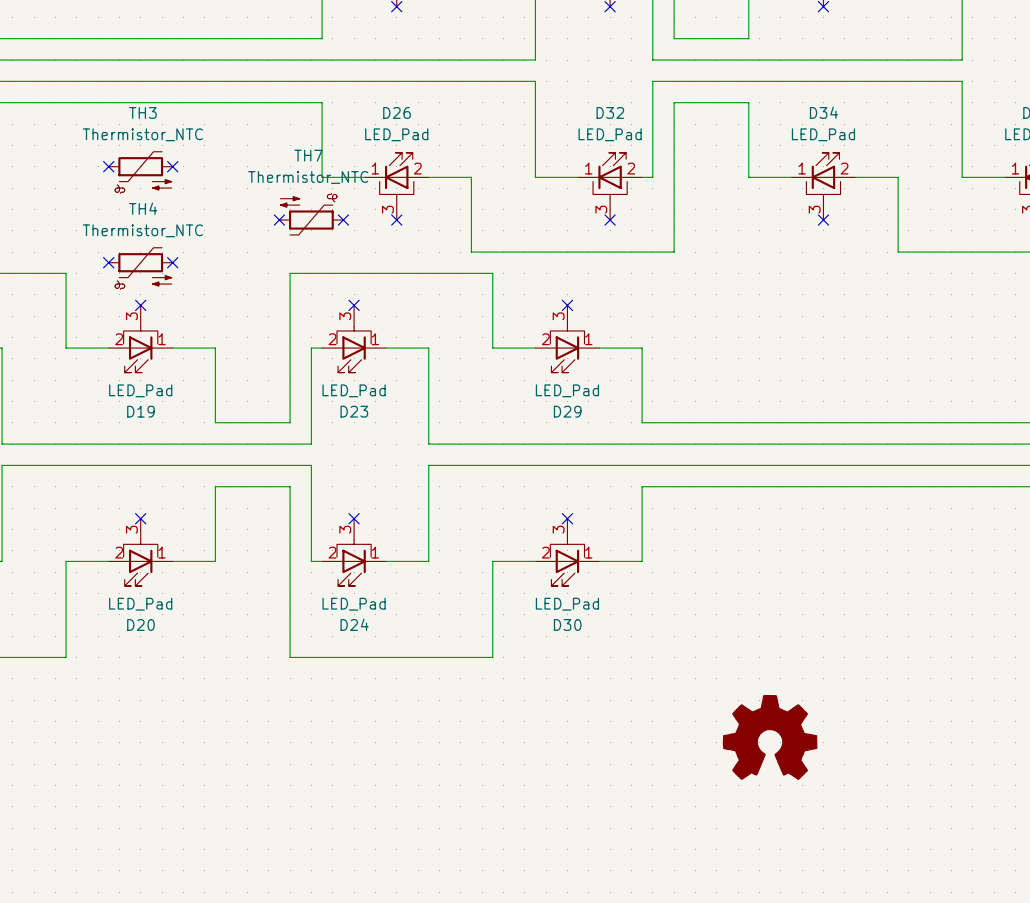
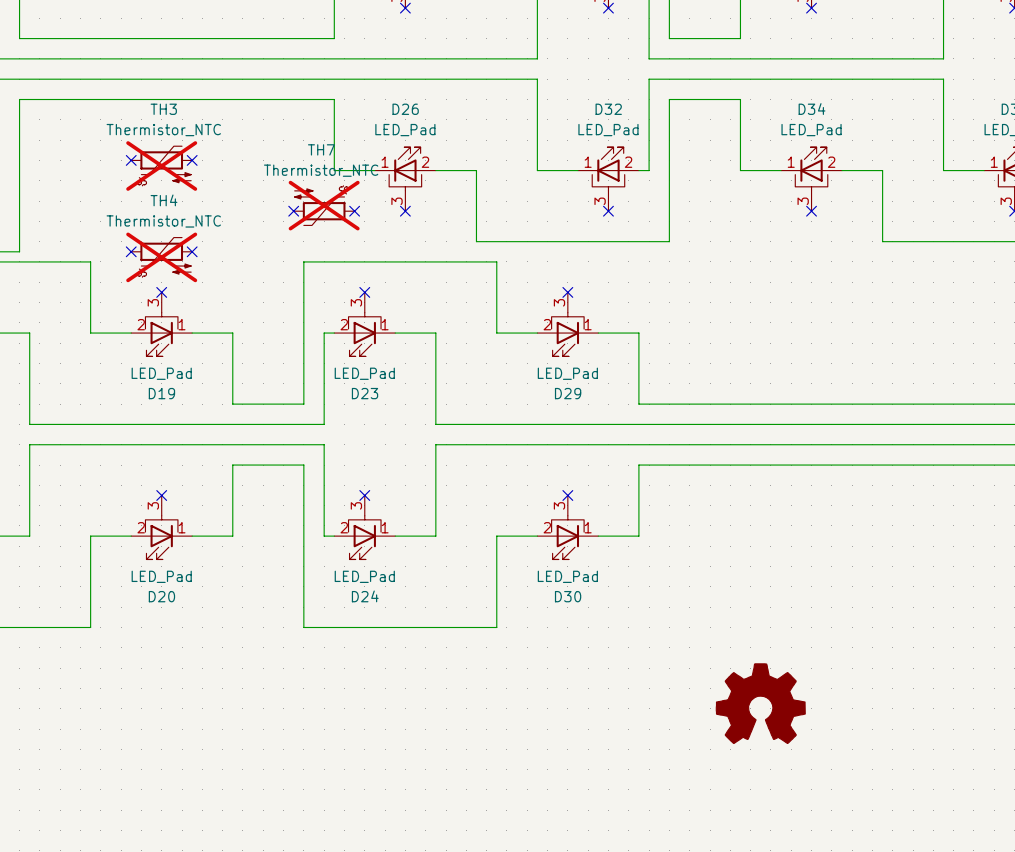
TH3 do-not-place cross: none -> (161, 166)
TH7 do-not-place cross: none -> (324, 205)
TH4 do-not-place cross: none -> (161, 257)

